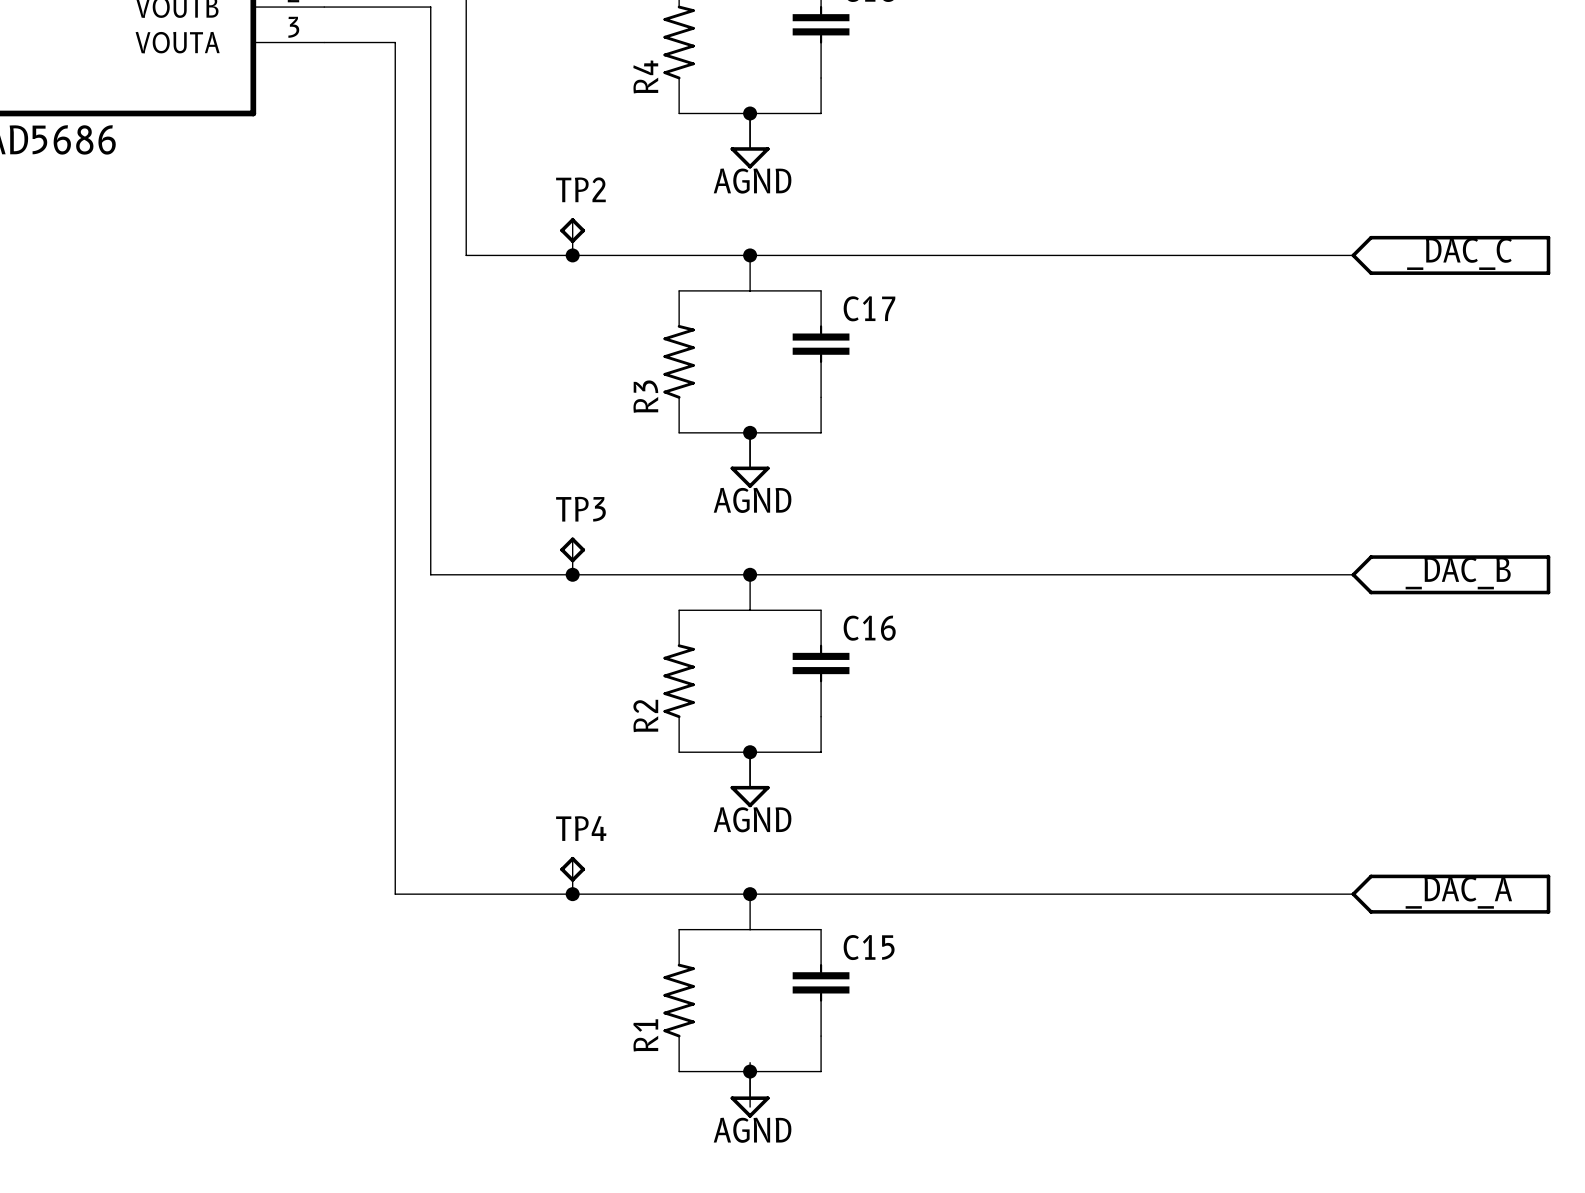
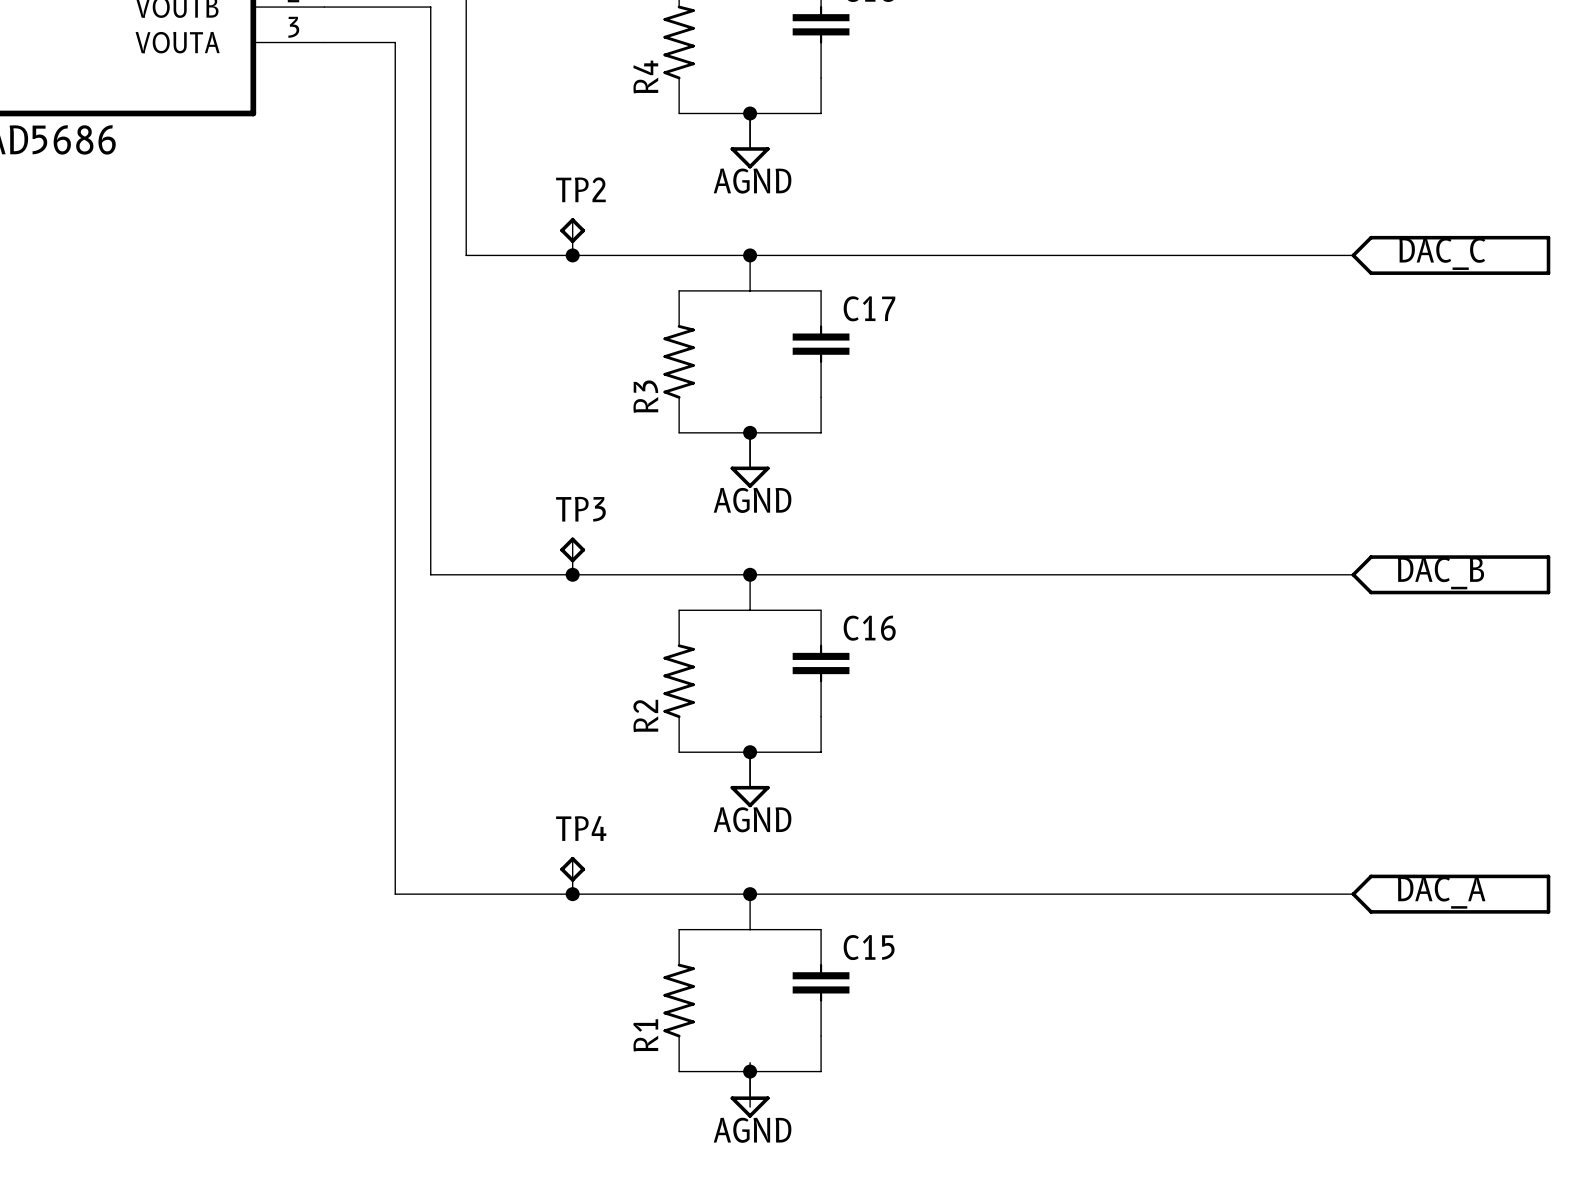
label: _DAC_C (1459, 253) -> DAC_C (1442, 253)
label: _DAC_B (1458, 573) -> DAC_B (1440, 573)
label: _DAC_A (1458, 892) -> DAC_A (1441, 892)

